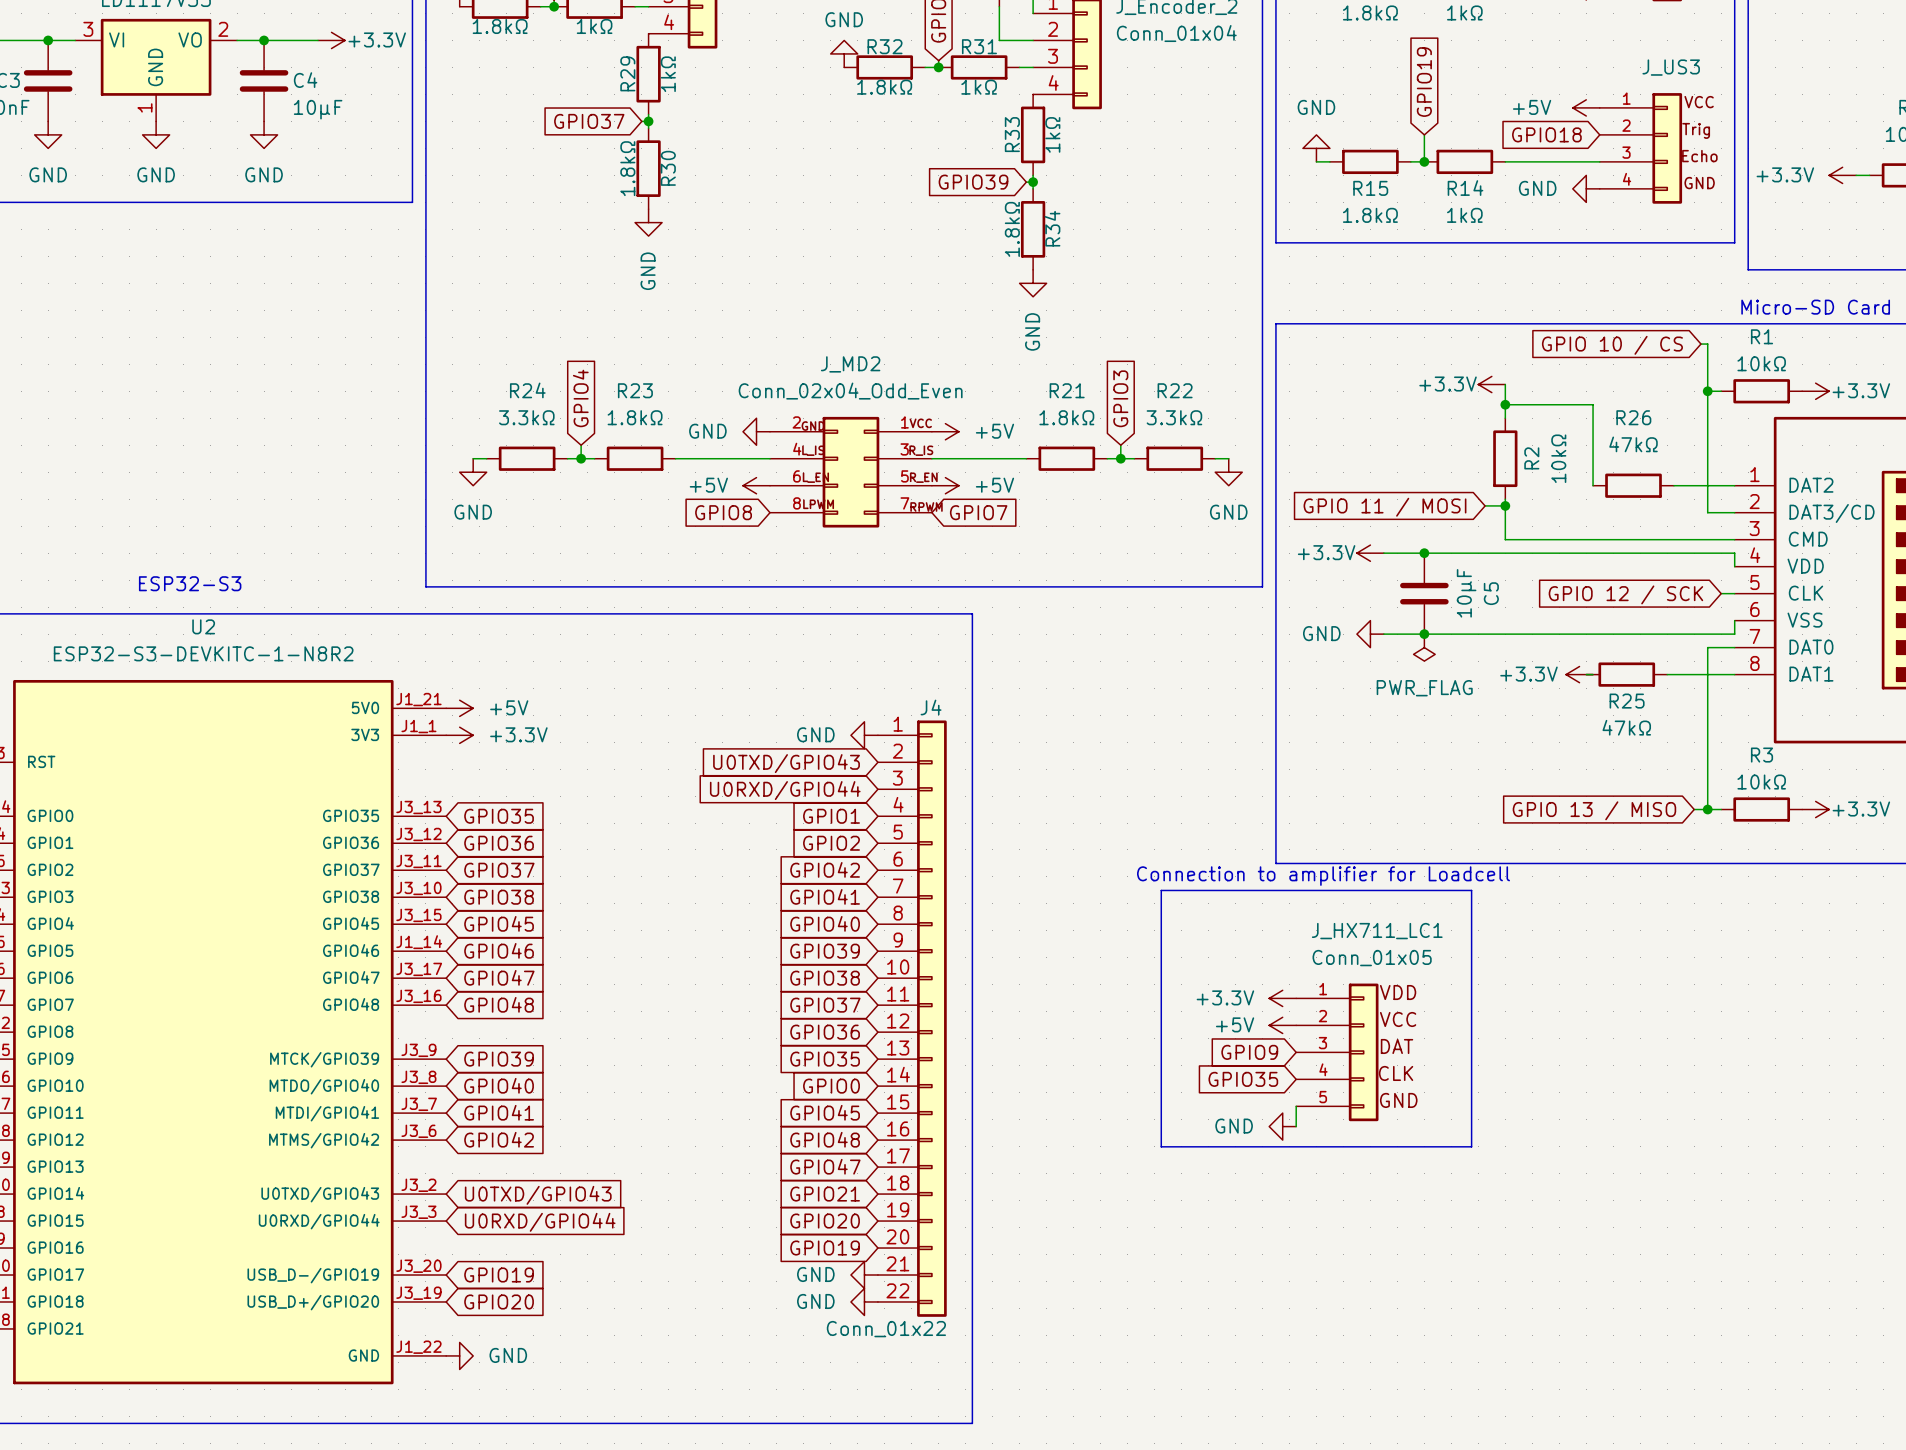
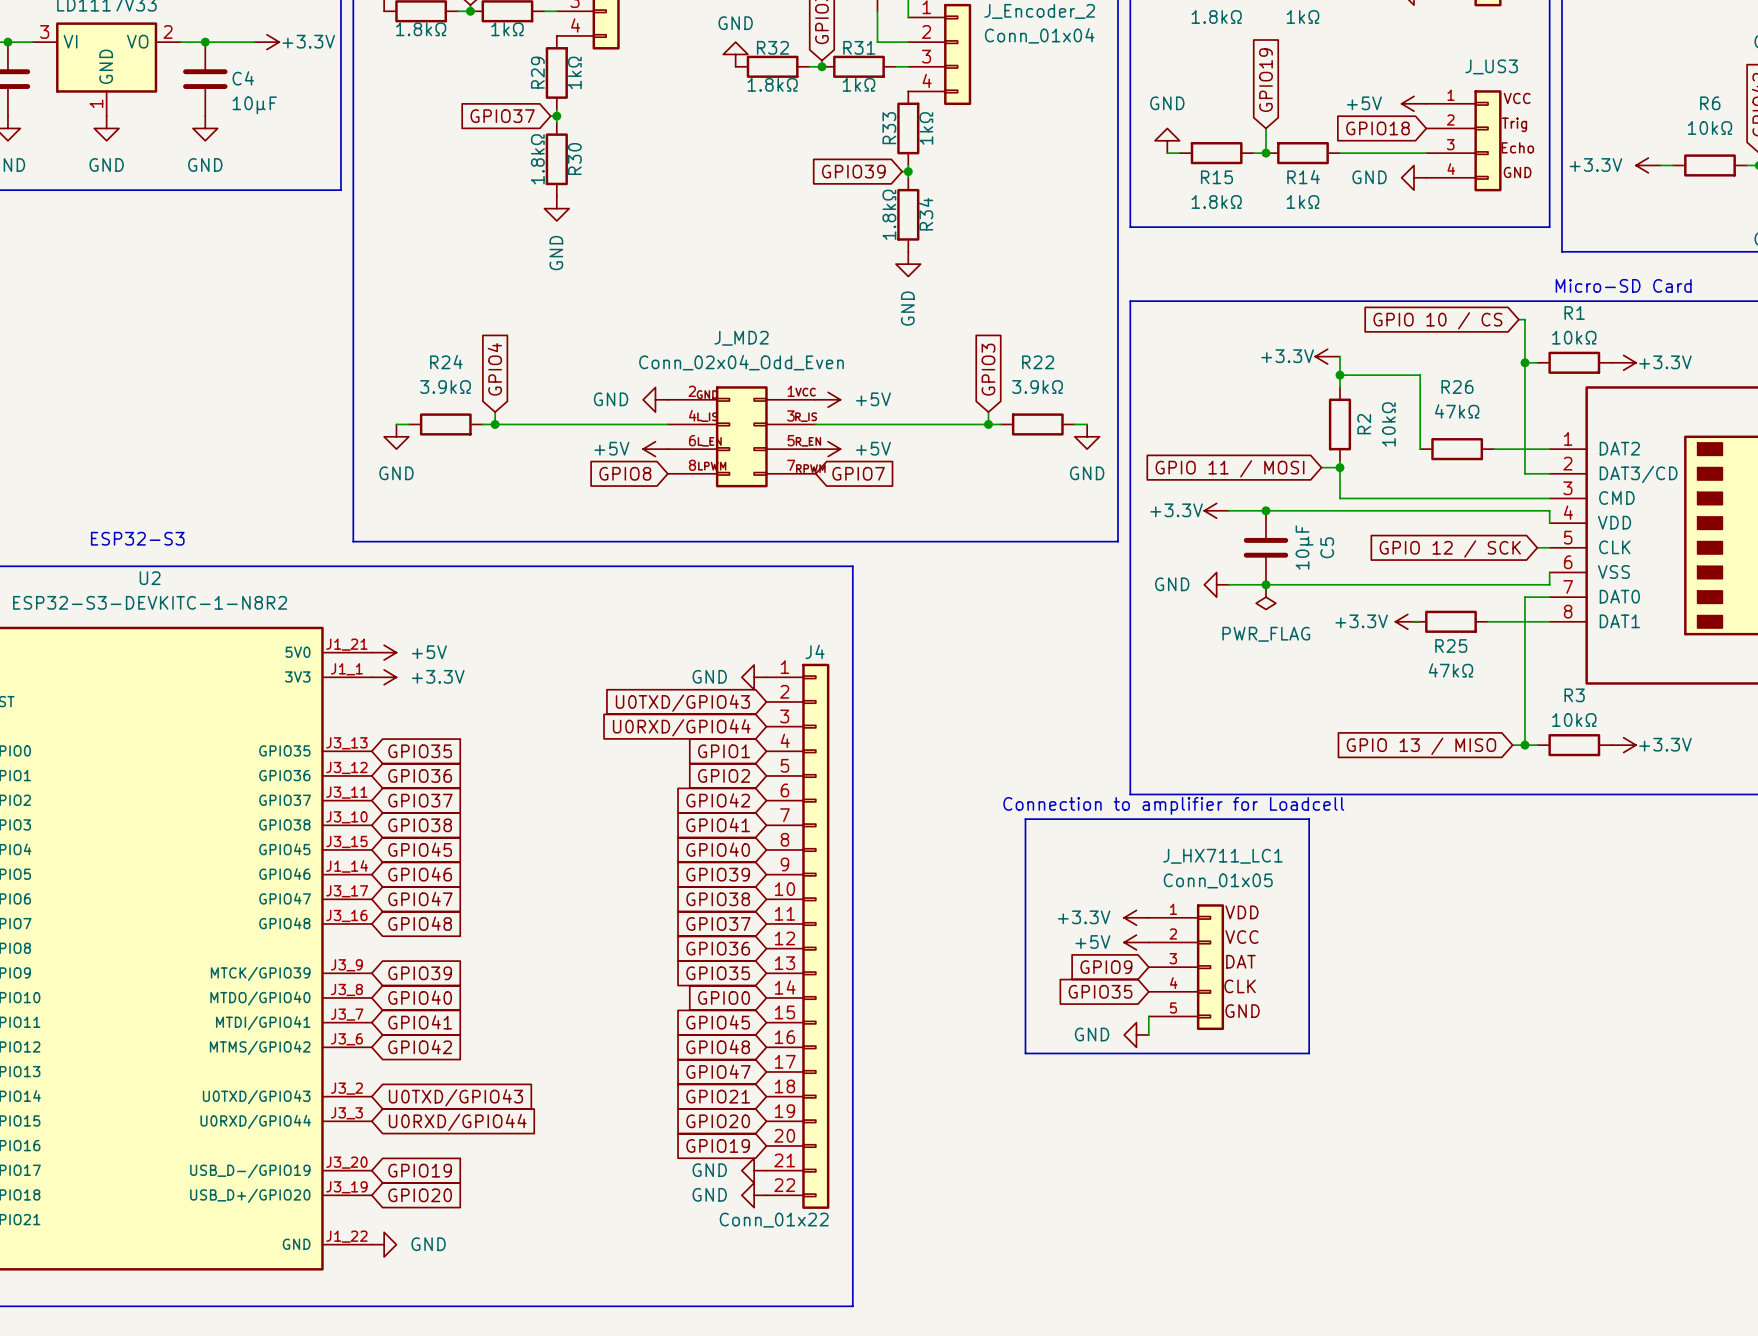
R24 value: 3.3kΩ (526, 417) -> 3.9kΩ (445, 387)
R22 value: 3.3kΩ (1174, 417) -> 3.9kΩ (1037, 387)
wire: none -> (507, 424) (581, 424)
R23: 1.8kΩ (635, 458) -> none
wire: none -> (902, 424) (976, 424)
R21: 1.8kΩ (1066, 458) -> none

